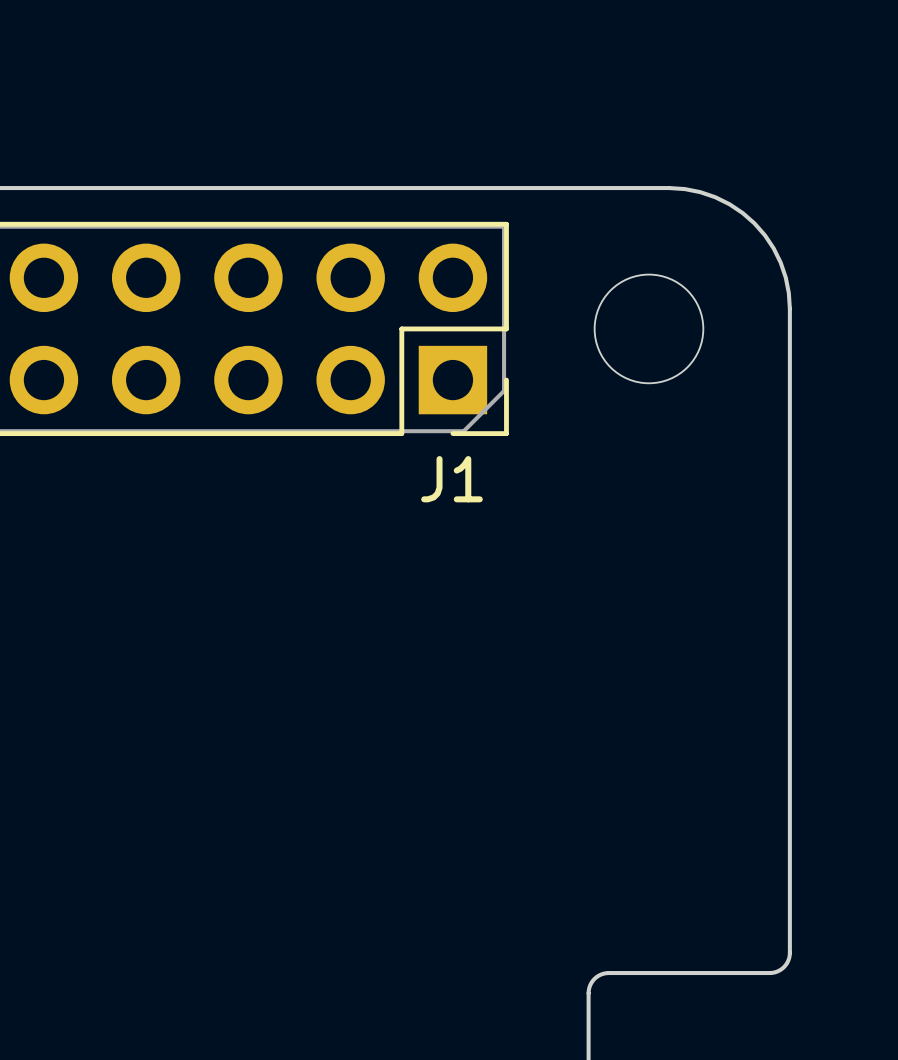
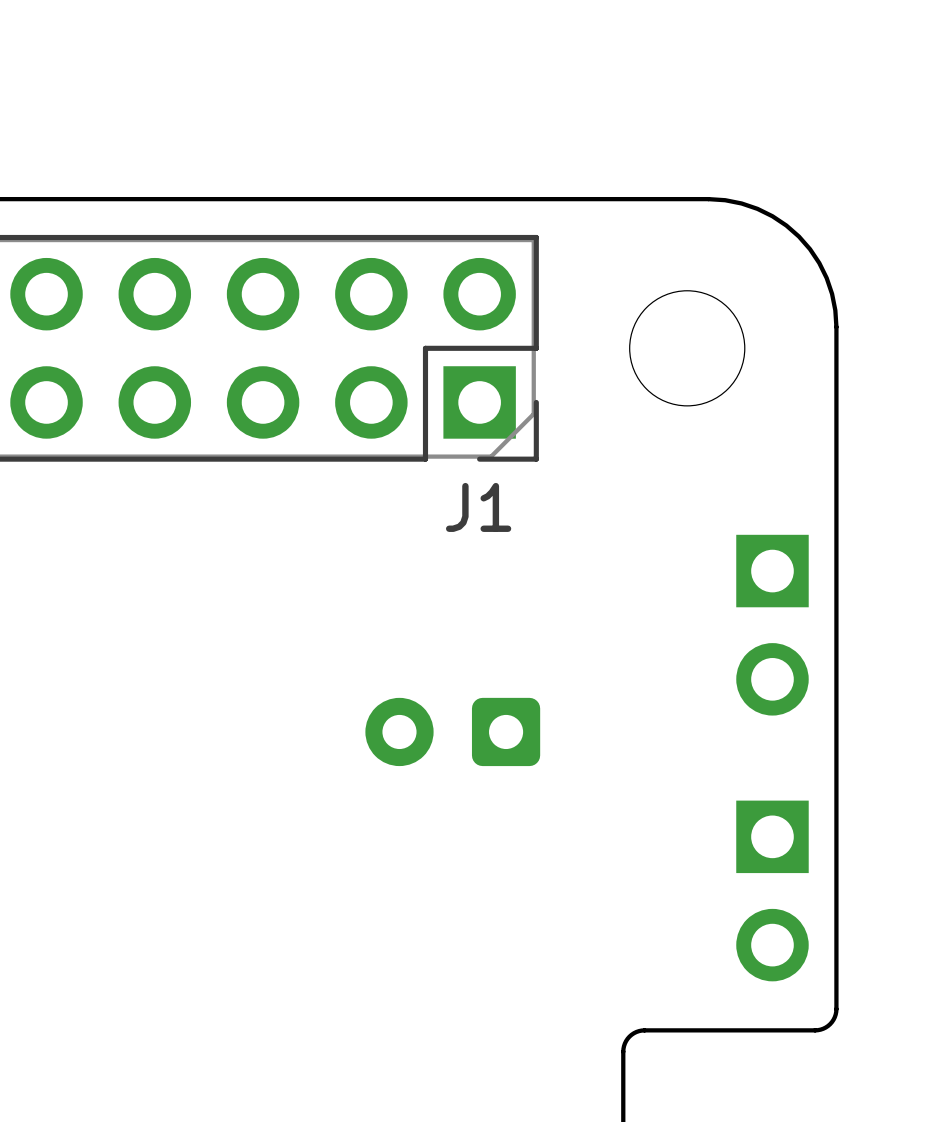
part: none -> (772, 625)
part: none -> (452, 731)
part: none -> (772, 890)

